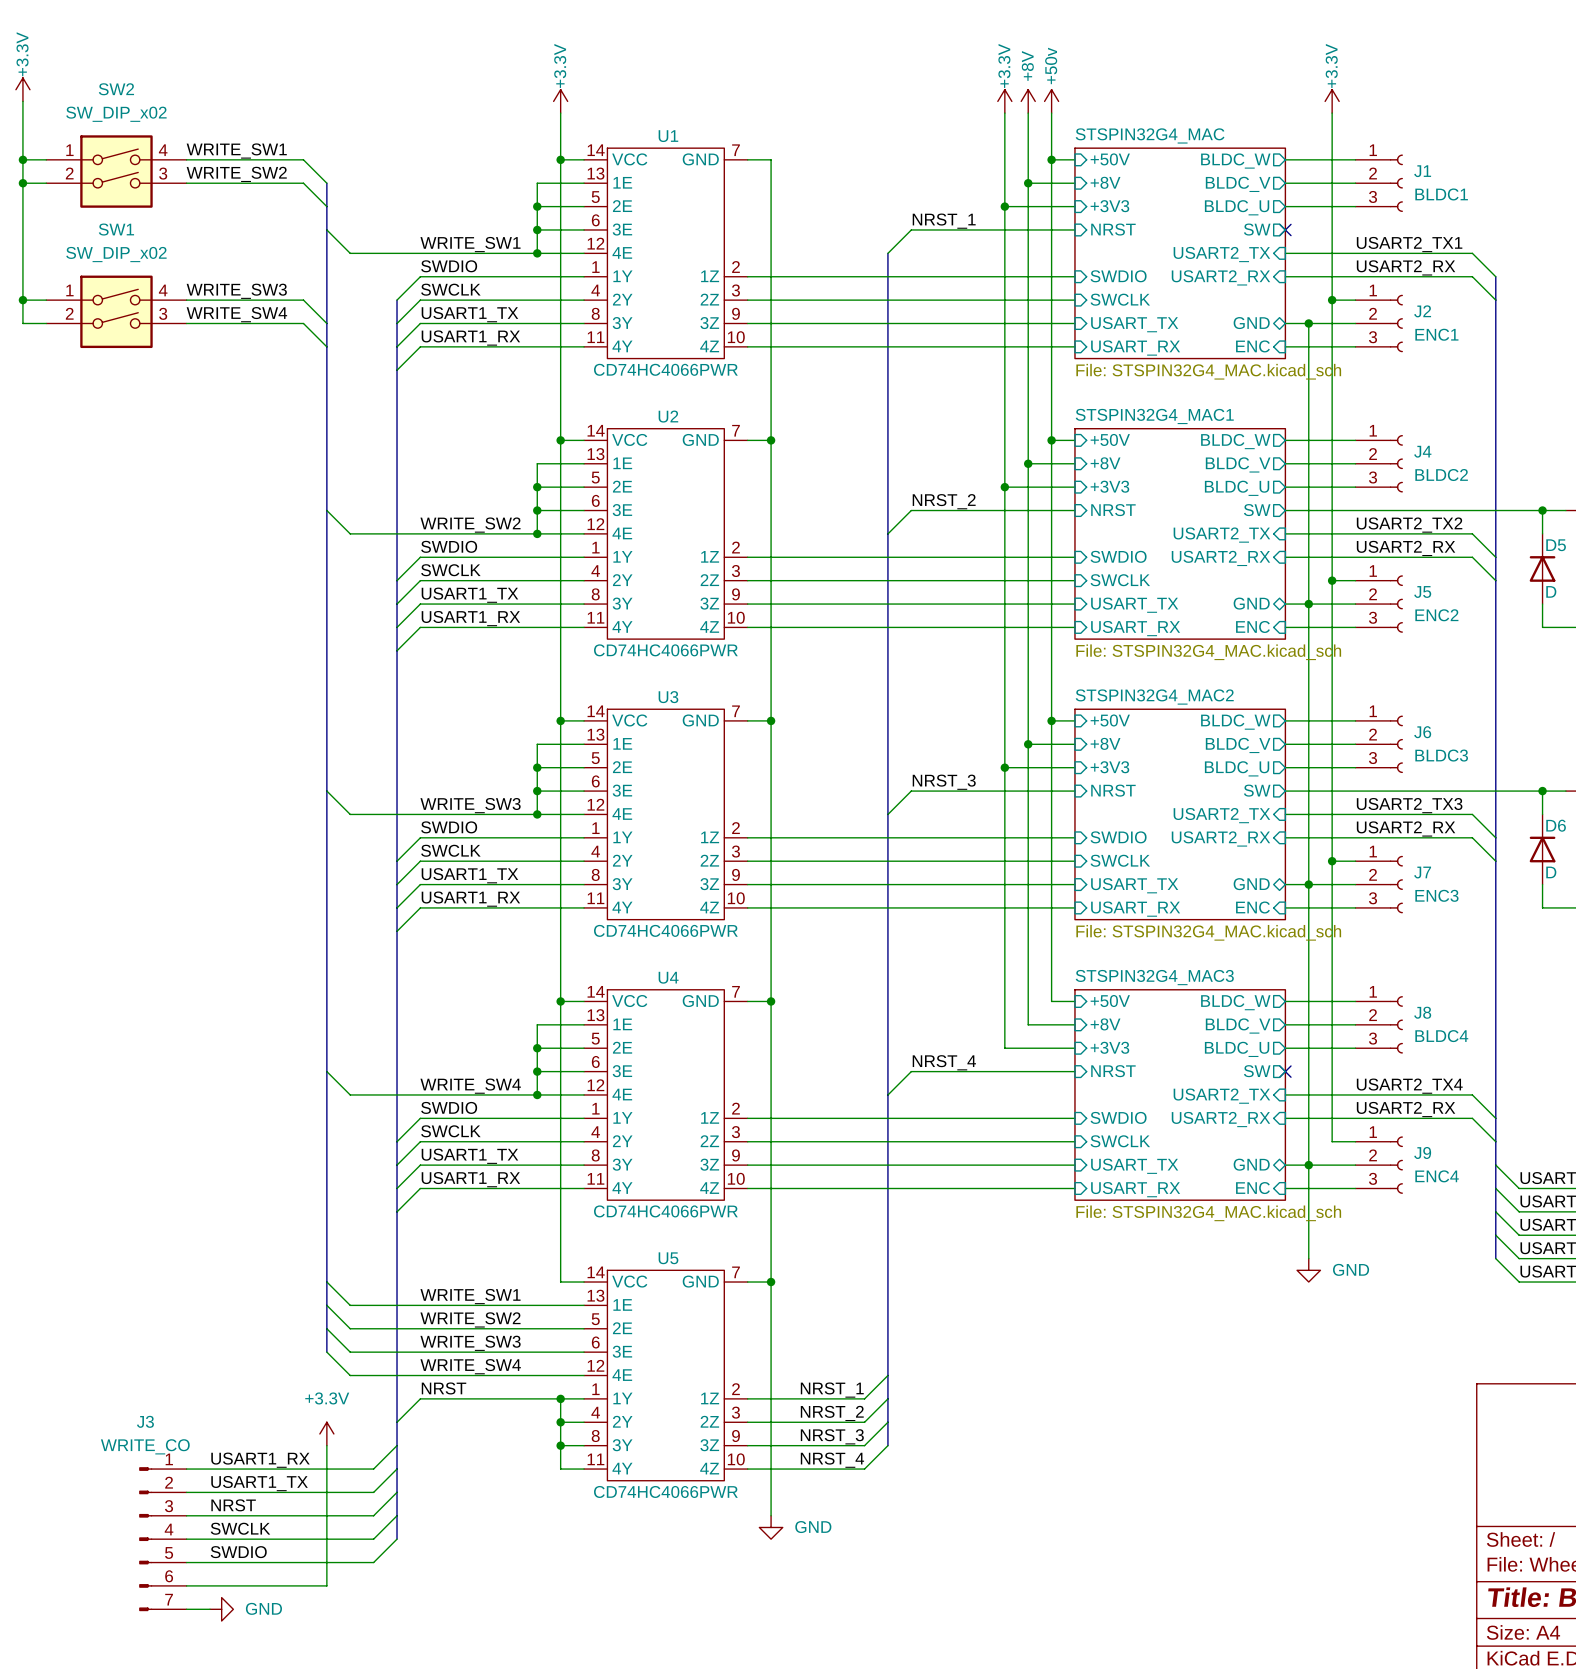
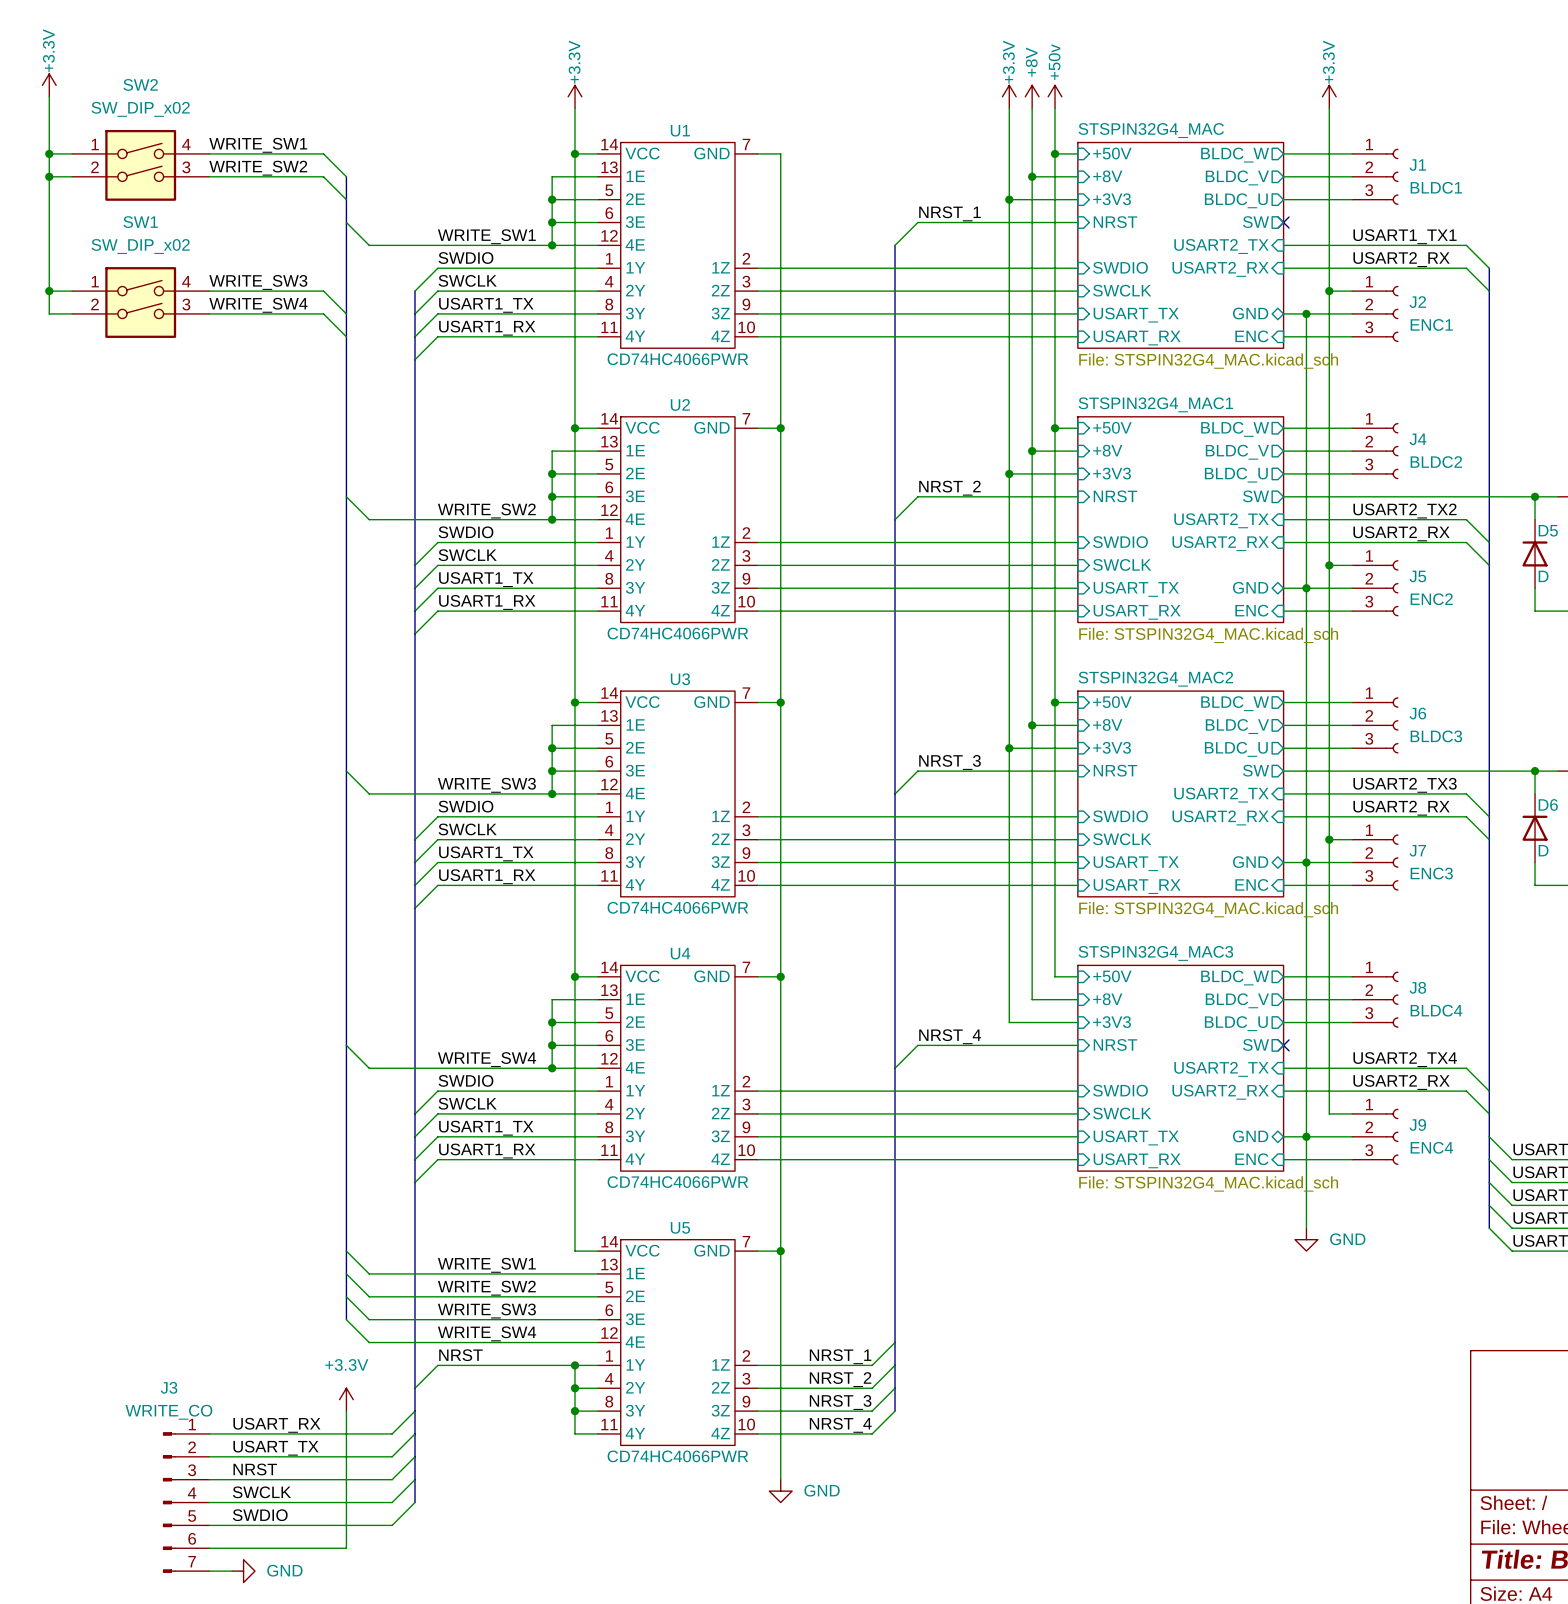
label: USART2_TX1 (1409, 244) -> USART1_TX1 (1405, 236)
label: USART1_RX (260, 1460) -> USART_RX (276, 1425)
label: USART1_TX (259, 1483) -> USART_TX (275, 1448)

